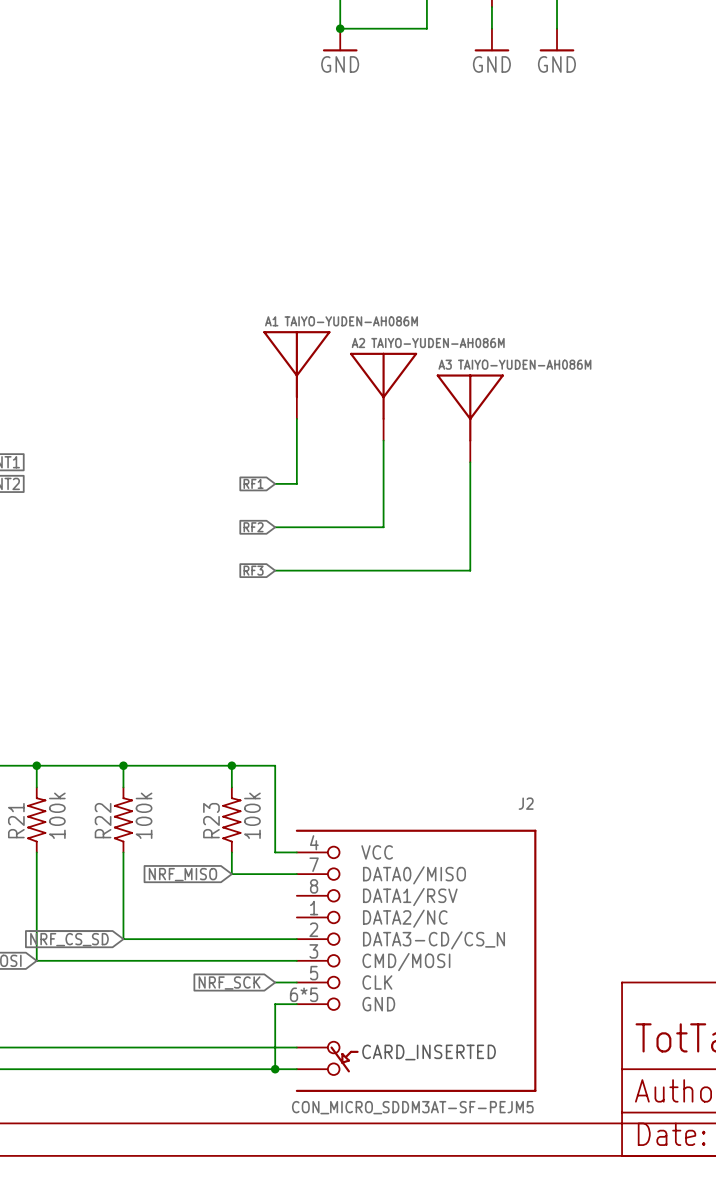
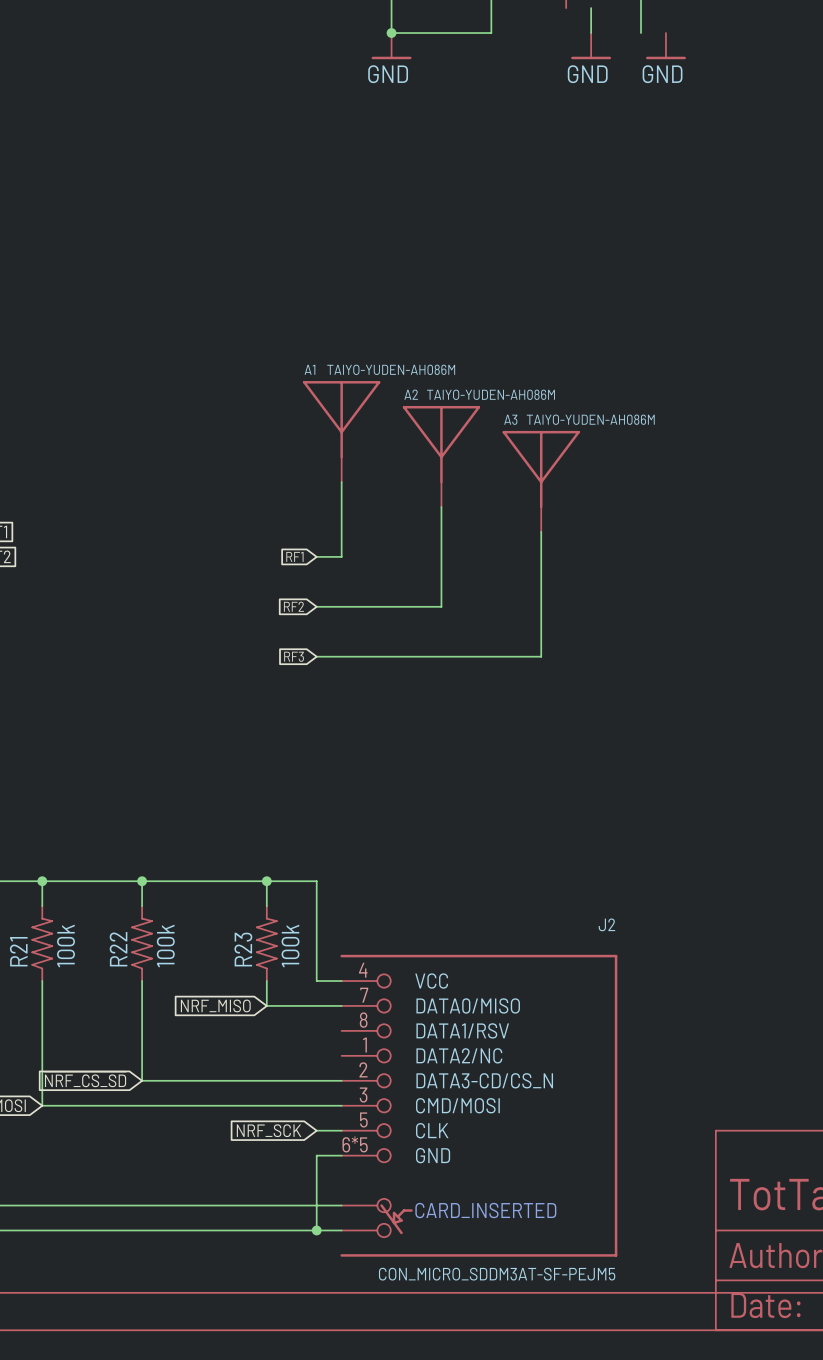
wire: (491, 7) (491, 28) -> (591, 8) (591, 33)
power symbol: GND (491, 40) -> none
power symbol: none -> GND (591, 46)
power symbol: GND (557, 40) -> none
power symbol: none -> GND (665, 46)

